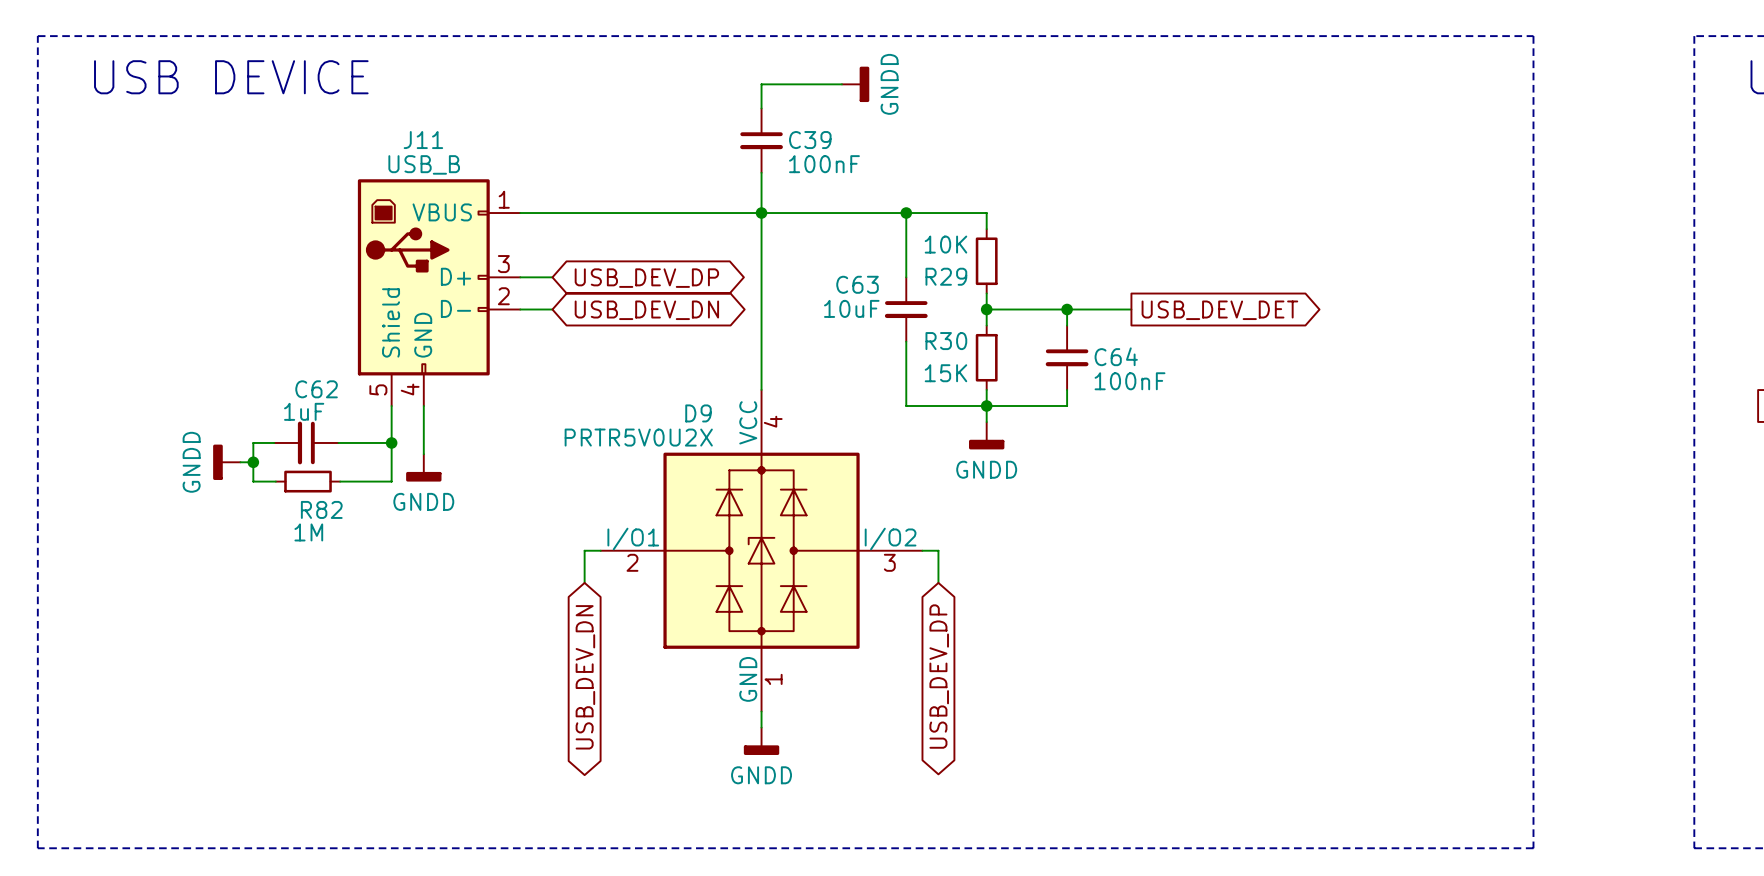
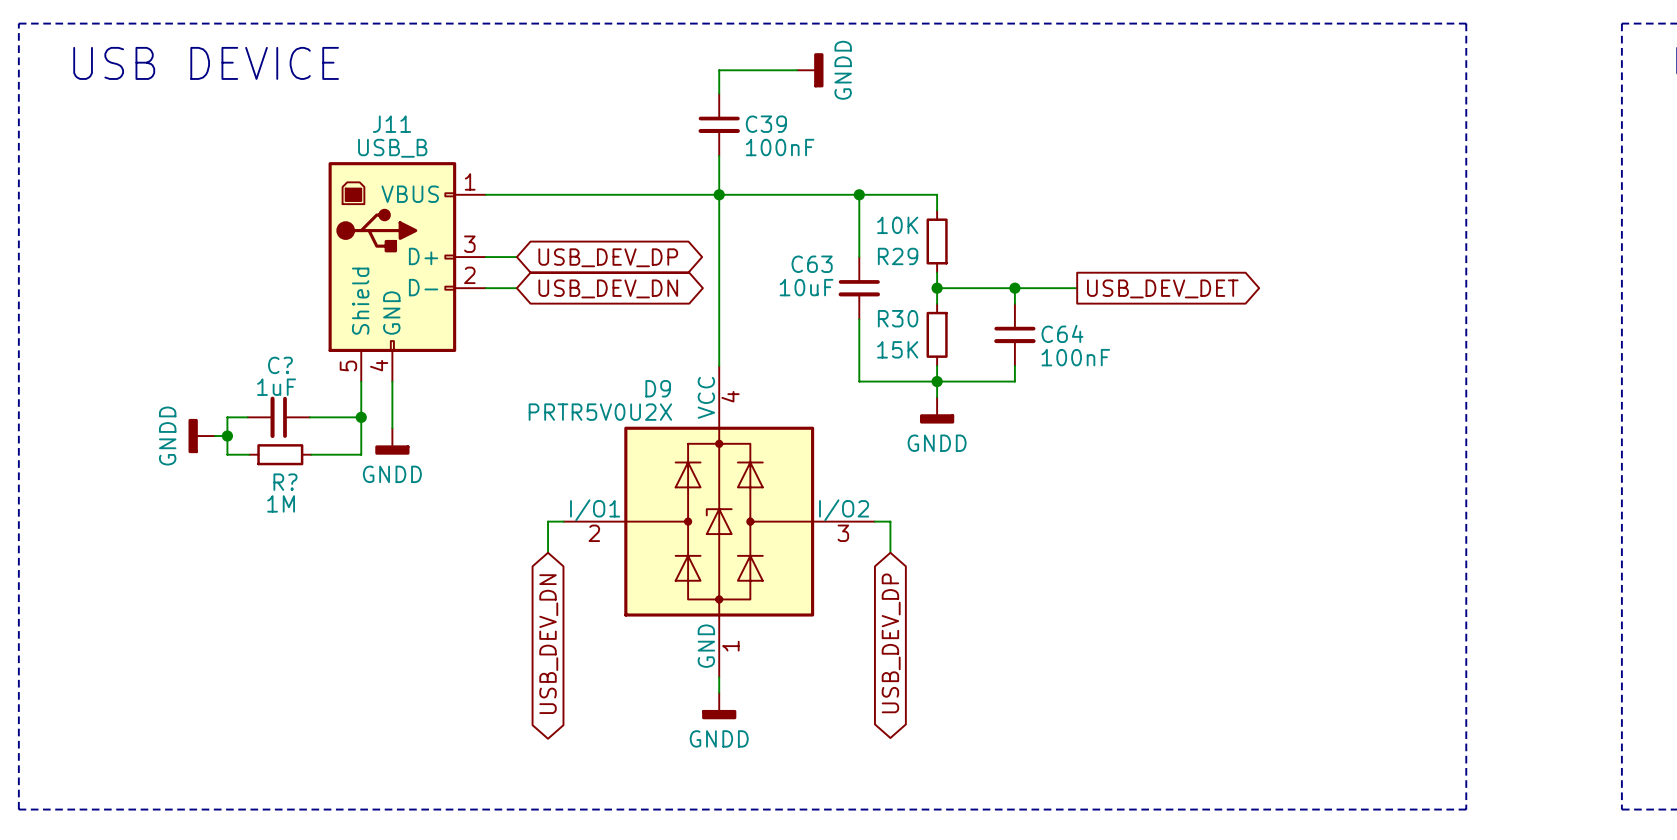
C62 name: C62 (316, 389) -> C? (280, 365)
R82 name: R82 (321, 509) -> R? (285, 482)

